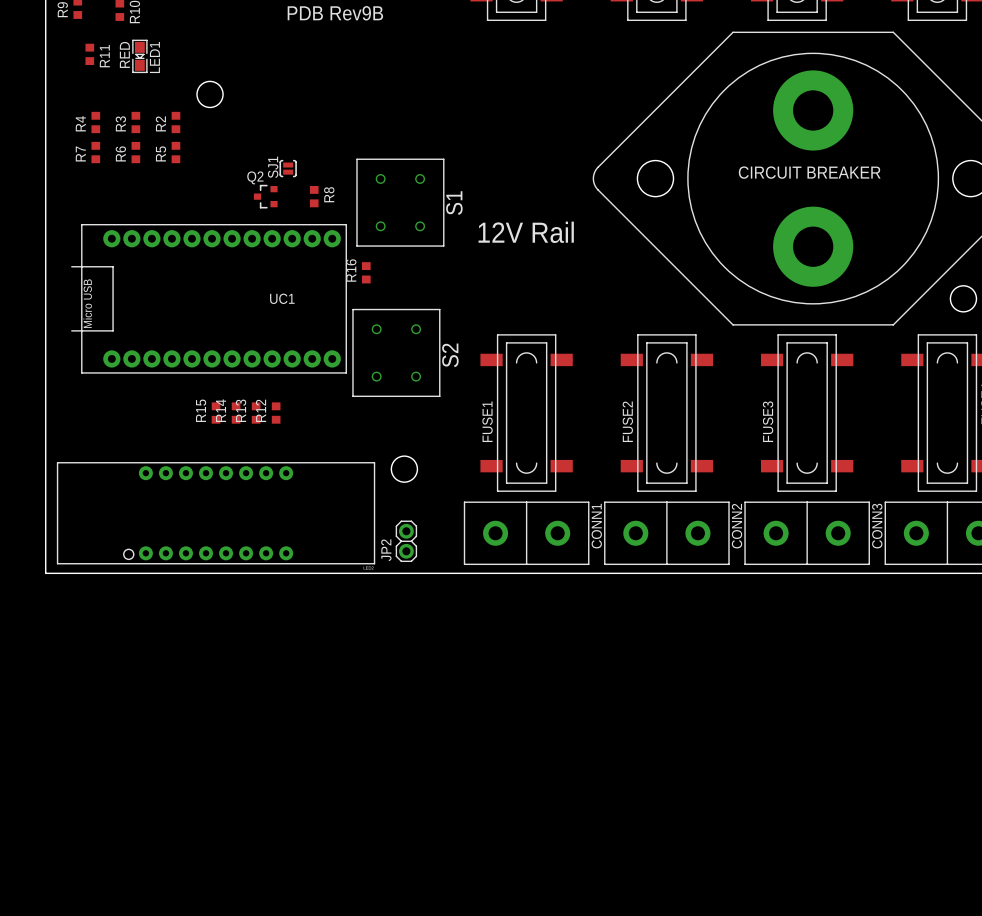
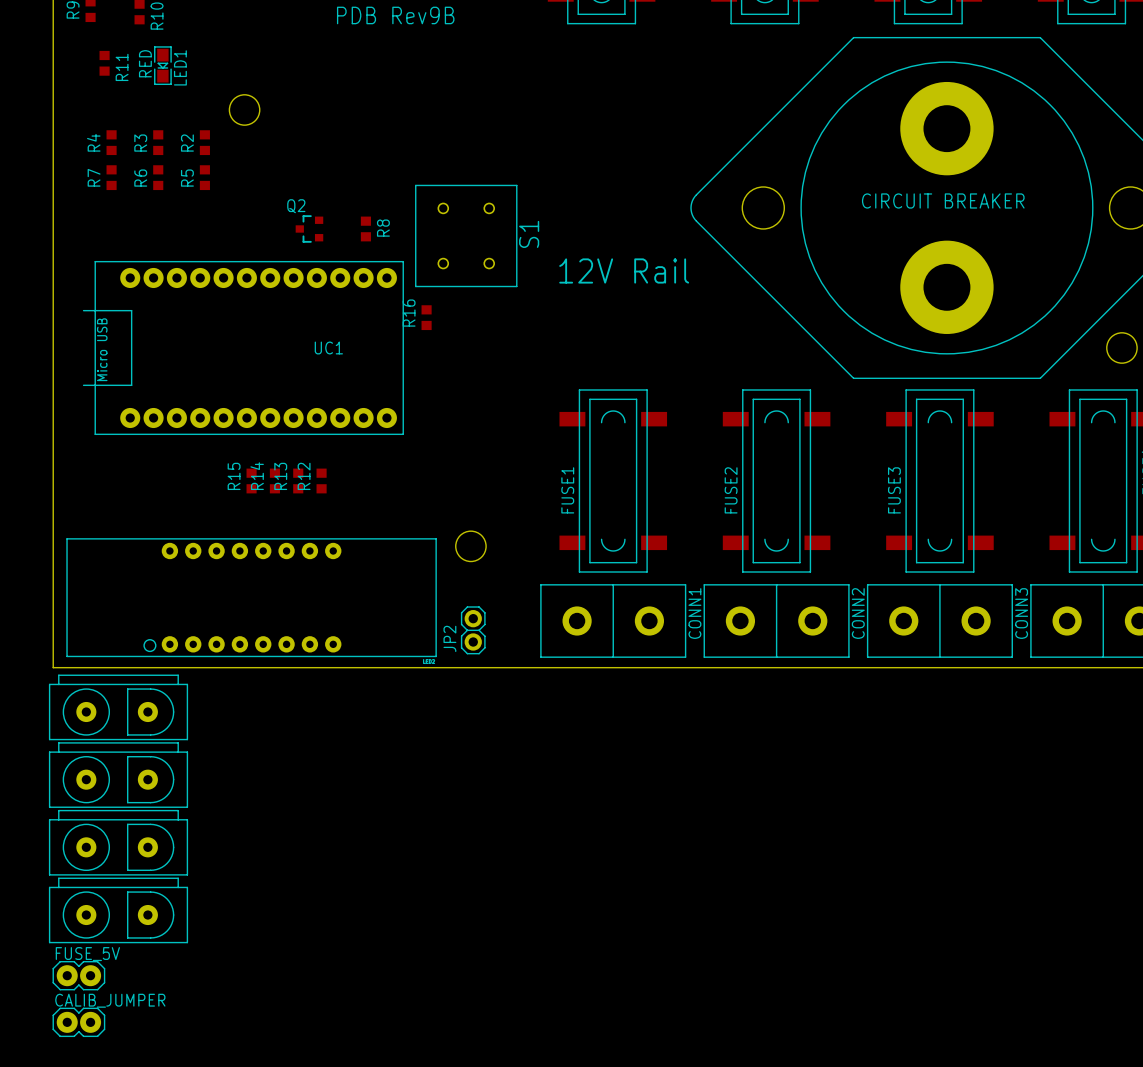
SJ1: (288, 168) -> none
S2: (396, 352) -> none
part: none -> (118, 707)
part: none -> (118, 775)
part: none -> (118, 842)
part: none -> (118, 910)
FUSE_5V: none -> (78, 975)
CALIB_JUMPER: none -> (78, 1022)

